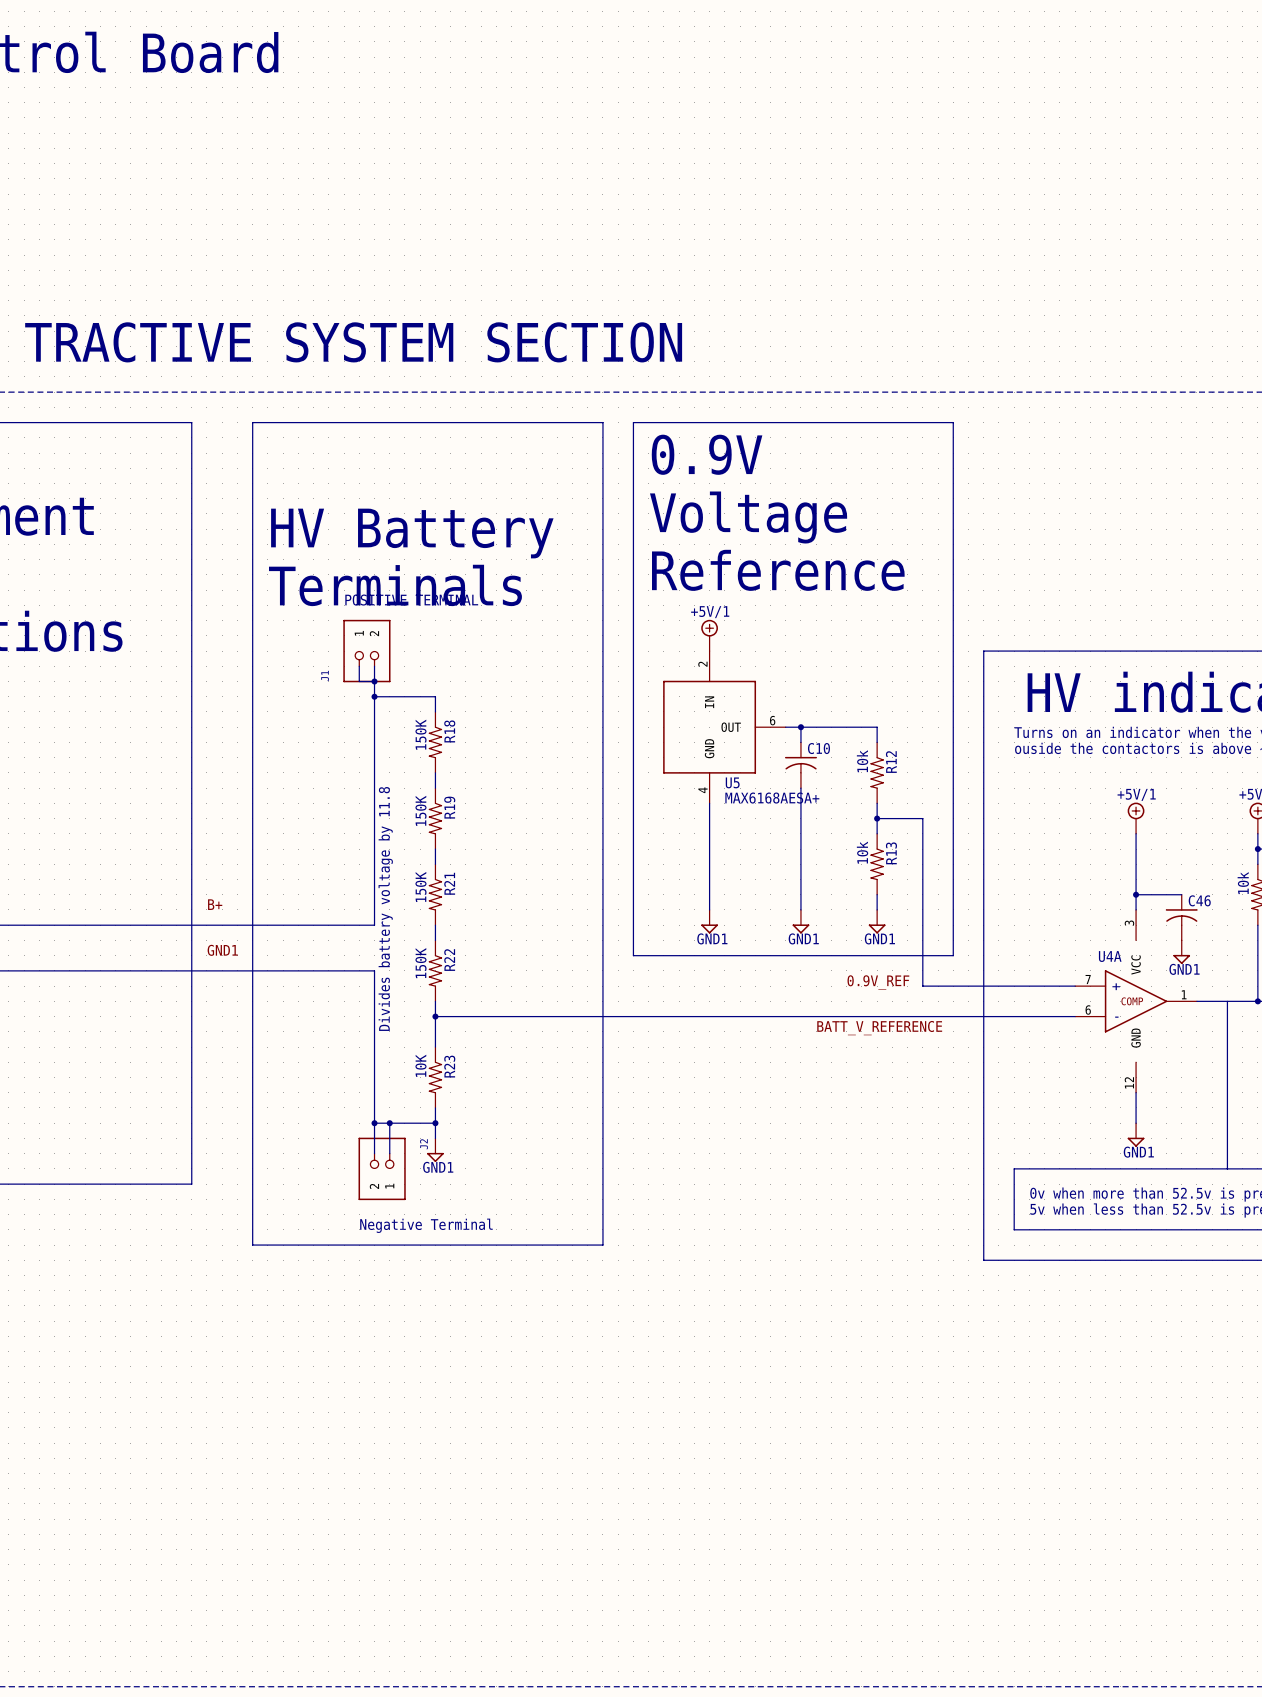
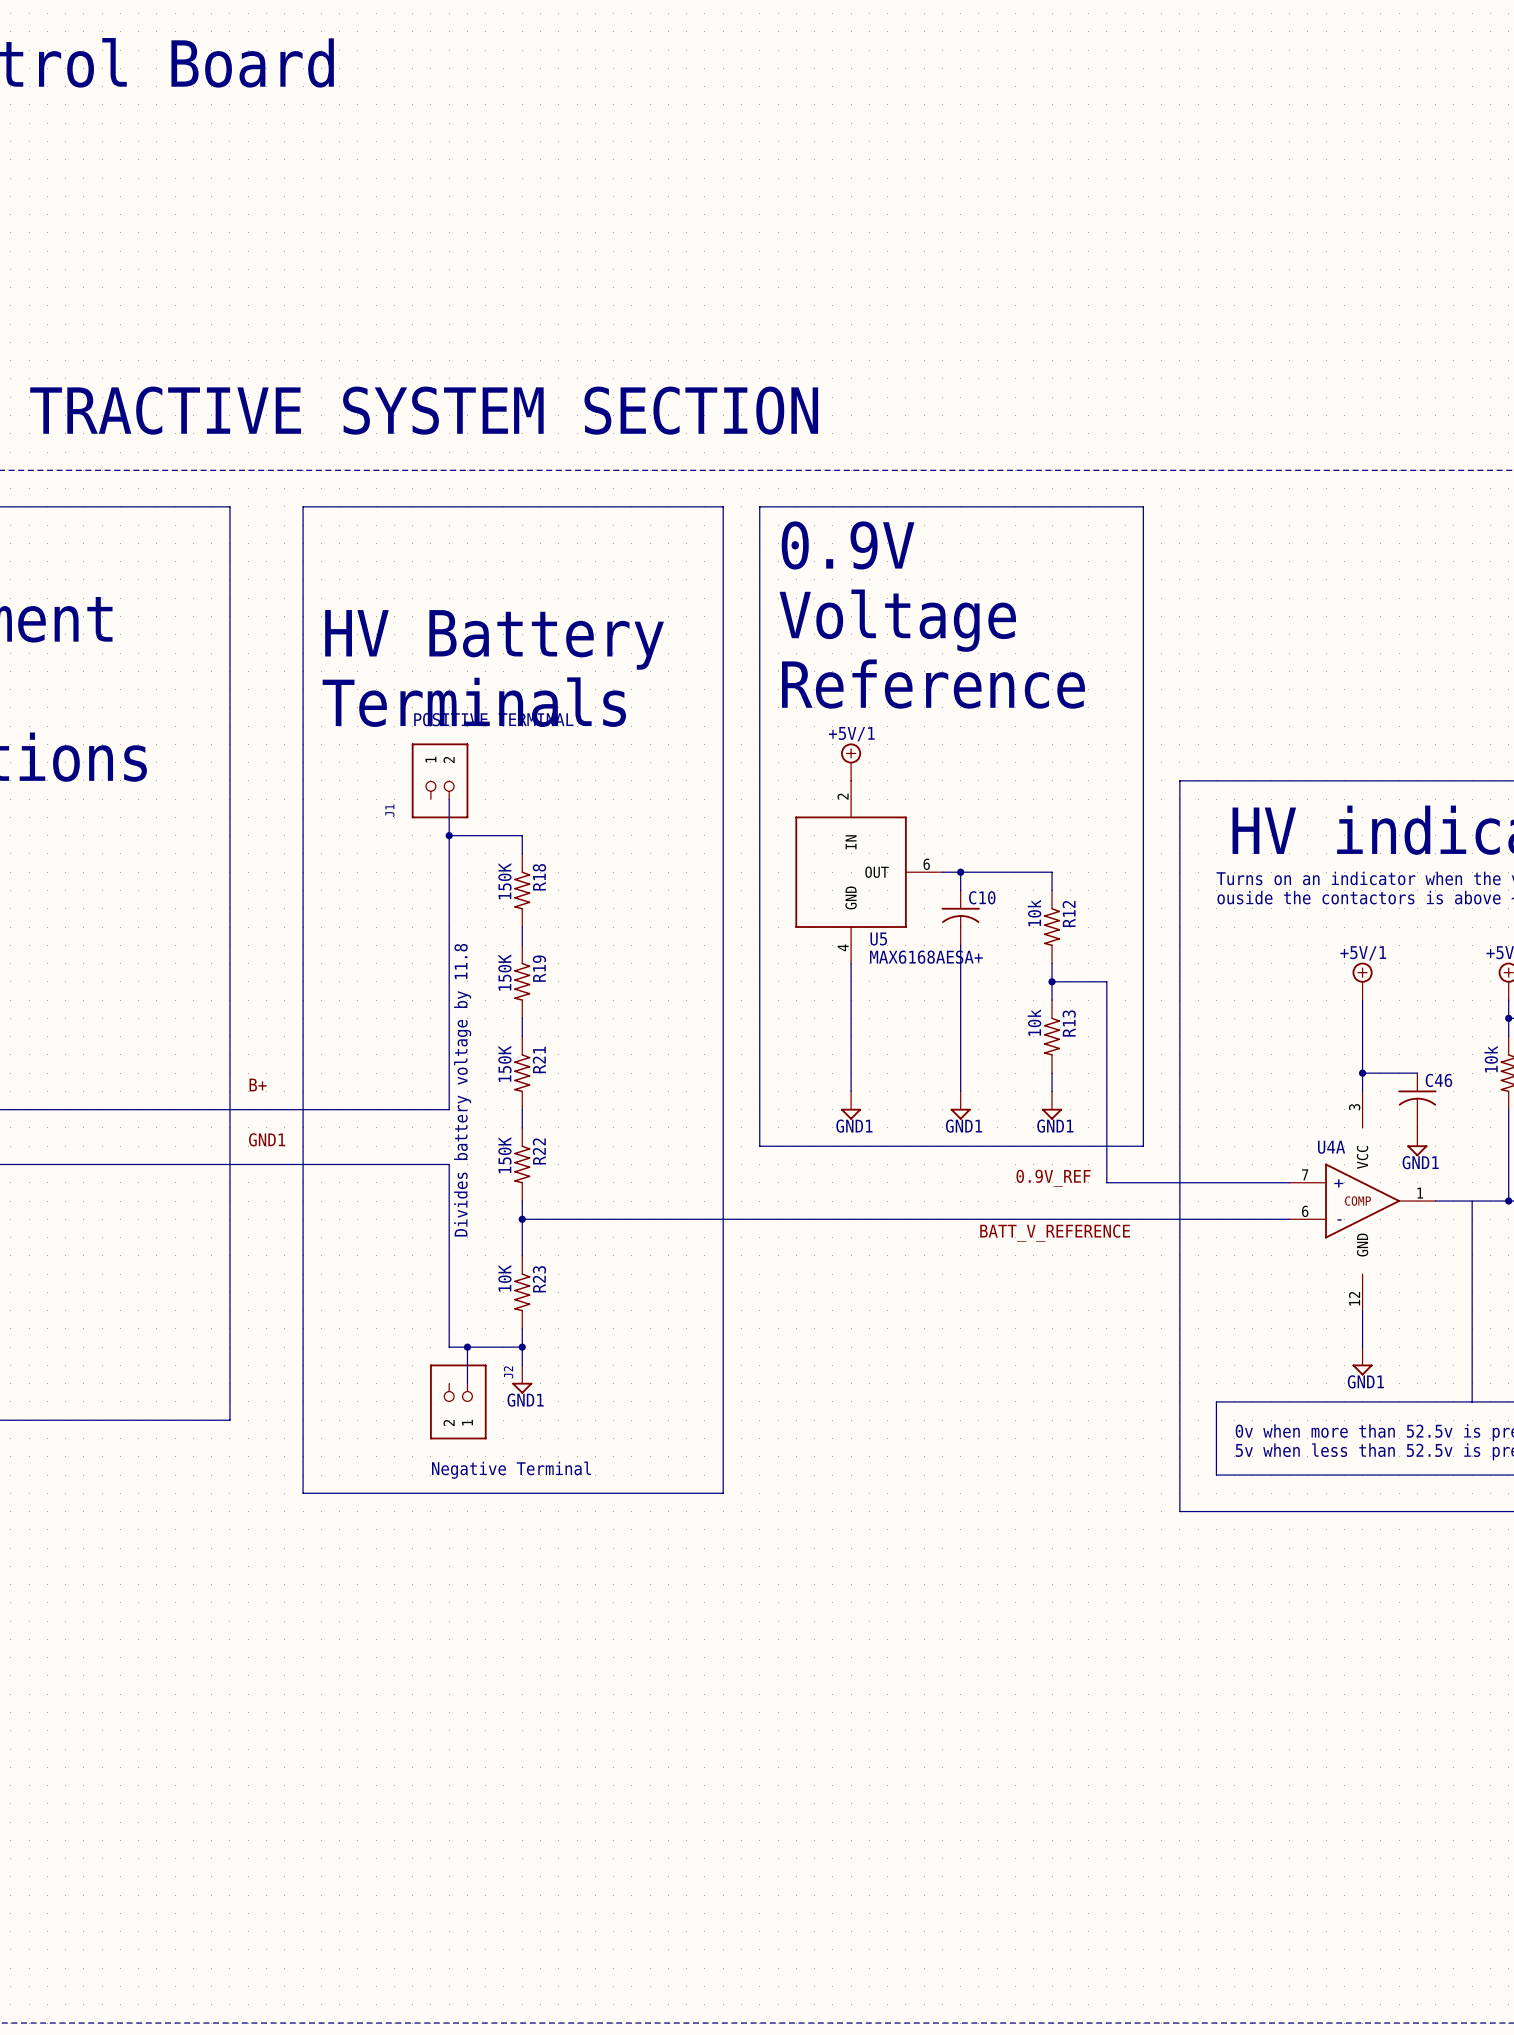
wire: (359, 666) (359, 681) (374, 681) -> none
junction: (374, 681) -> none
wire: (374, 1123) (374, 1153) -> none
junction: (374, 1123) -> none

